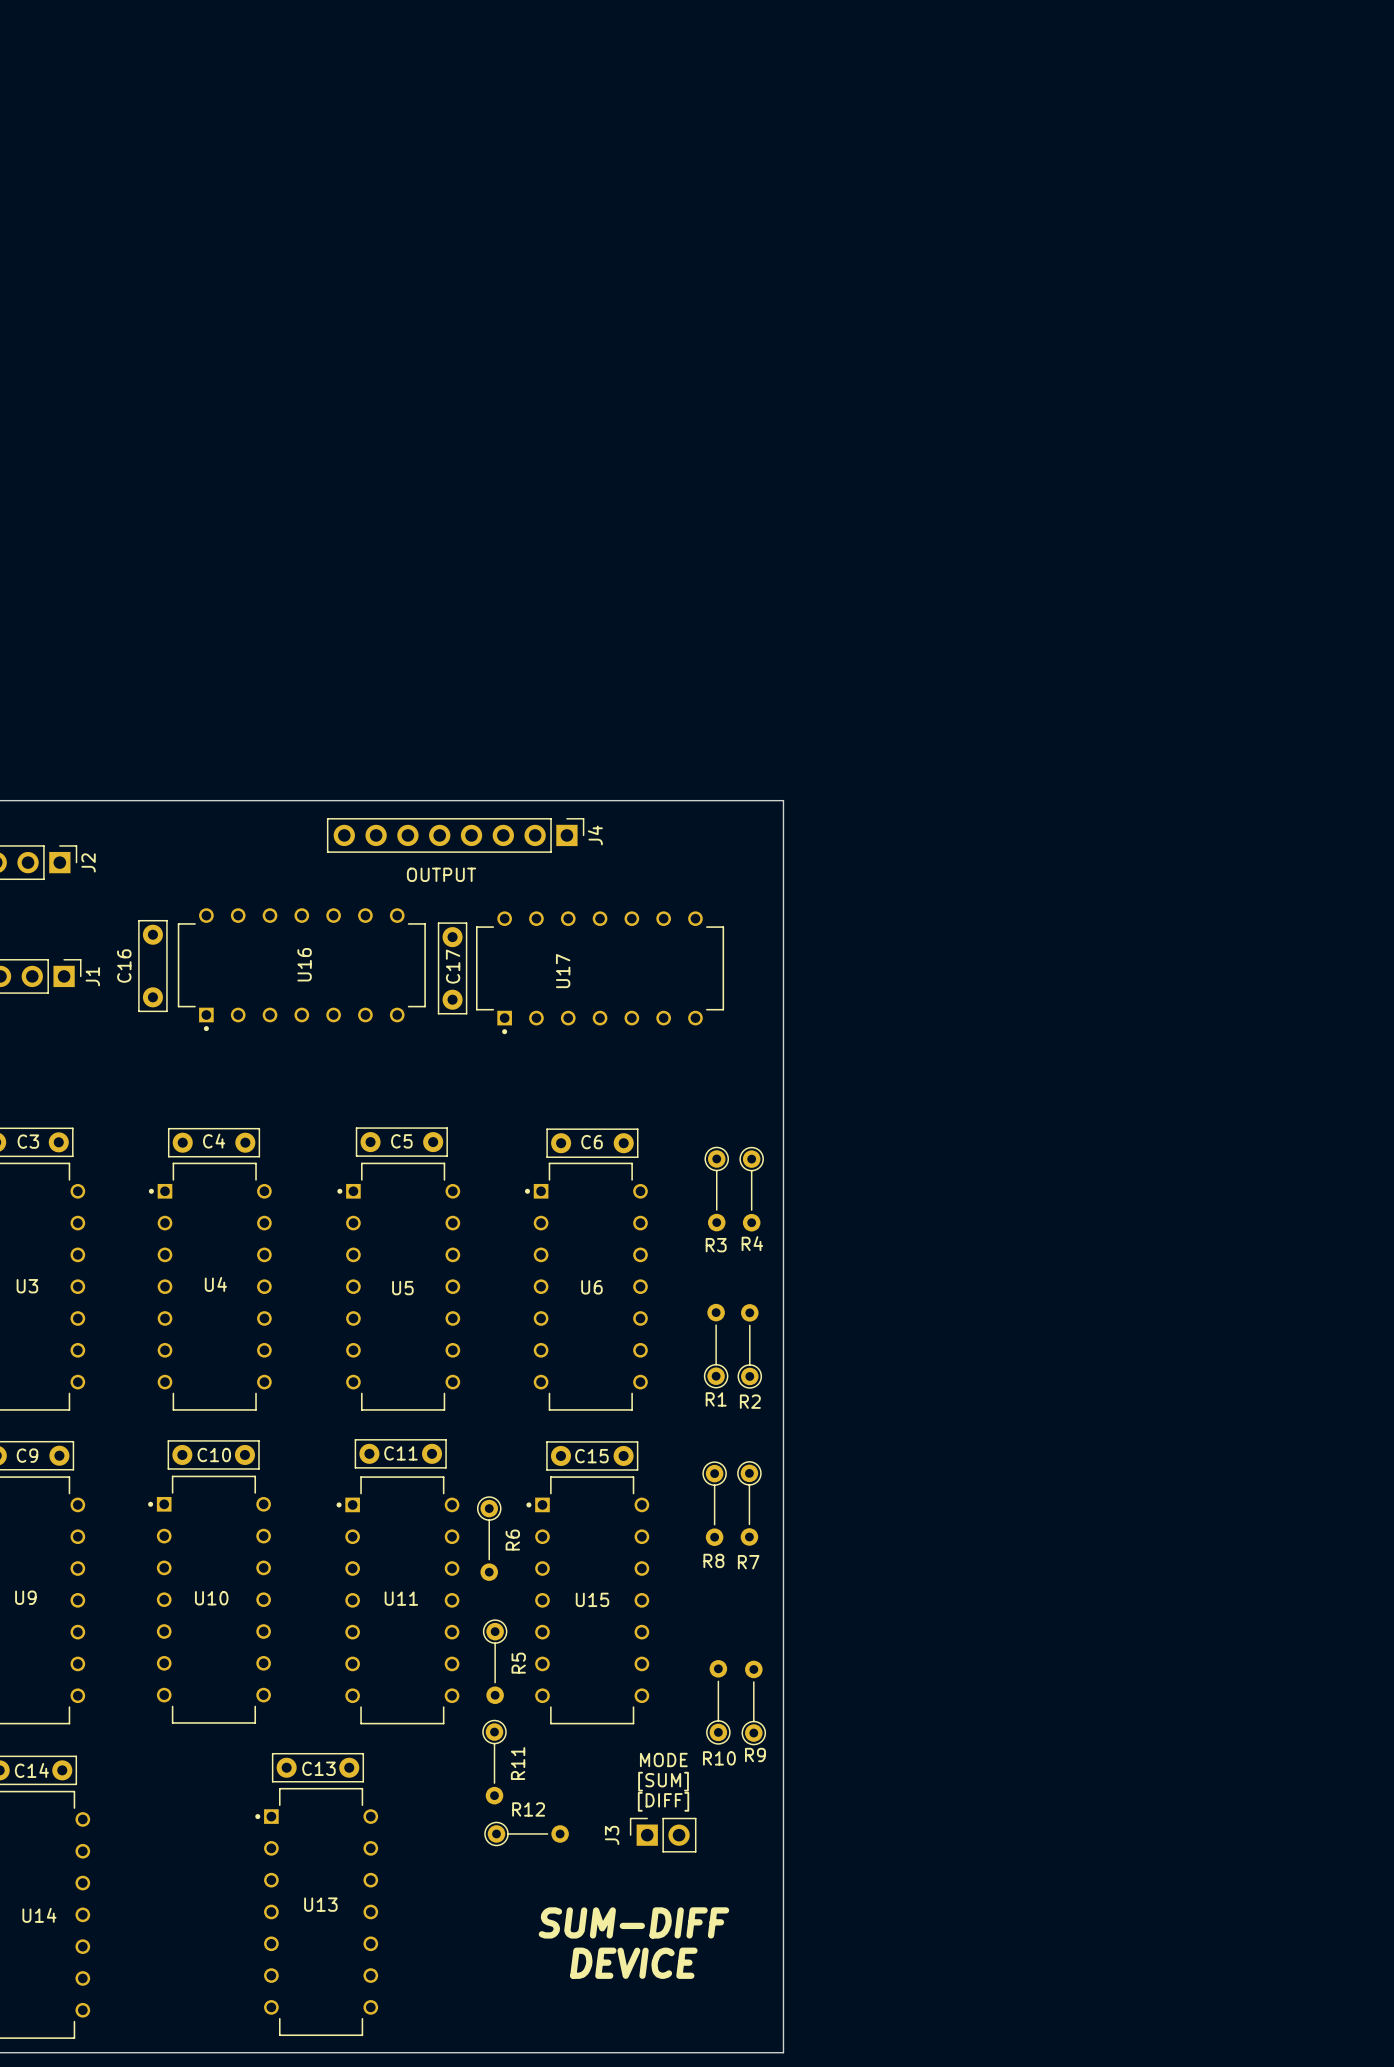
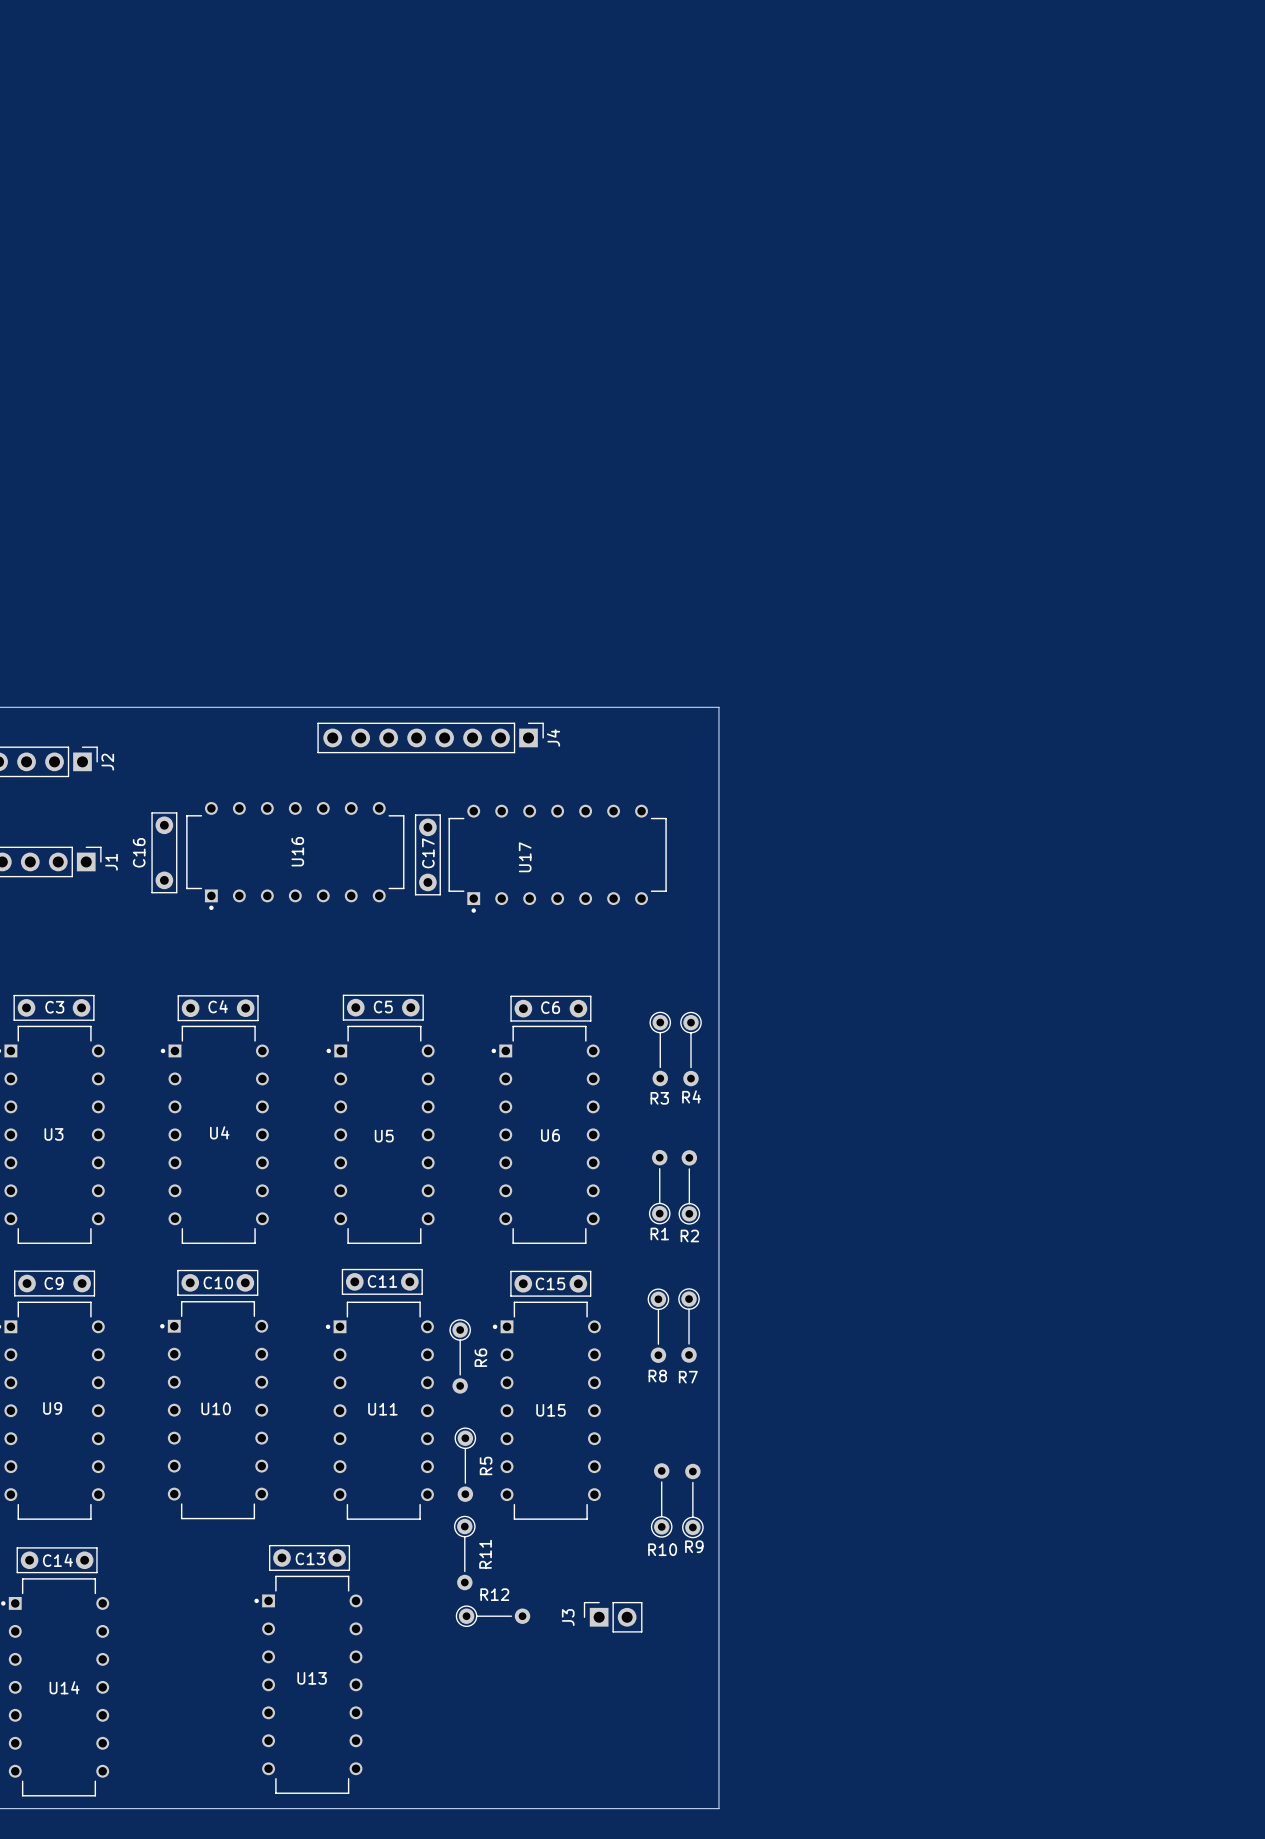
text: OUTPUT (441, 874) -> none
text: MODE (663, 1760) -> none
text: [SUM] (663, 1781) -> none
text: [DIFF] (663, 1801) -> none
text: SUM-DIFF (633, 1922) -> none
text: DEVICE (633, 1963) -> none

